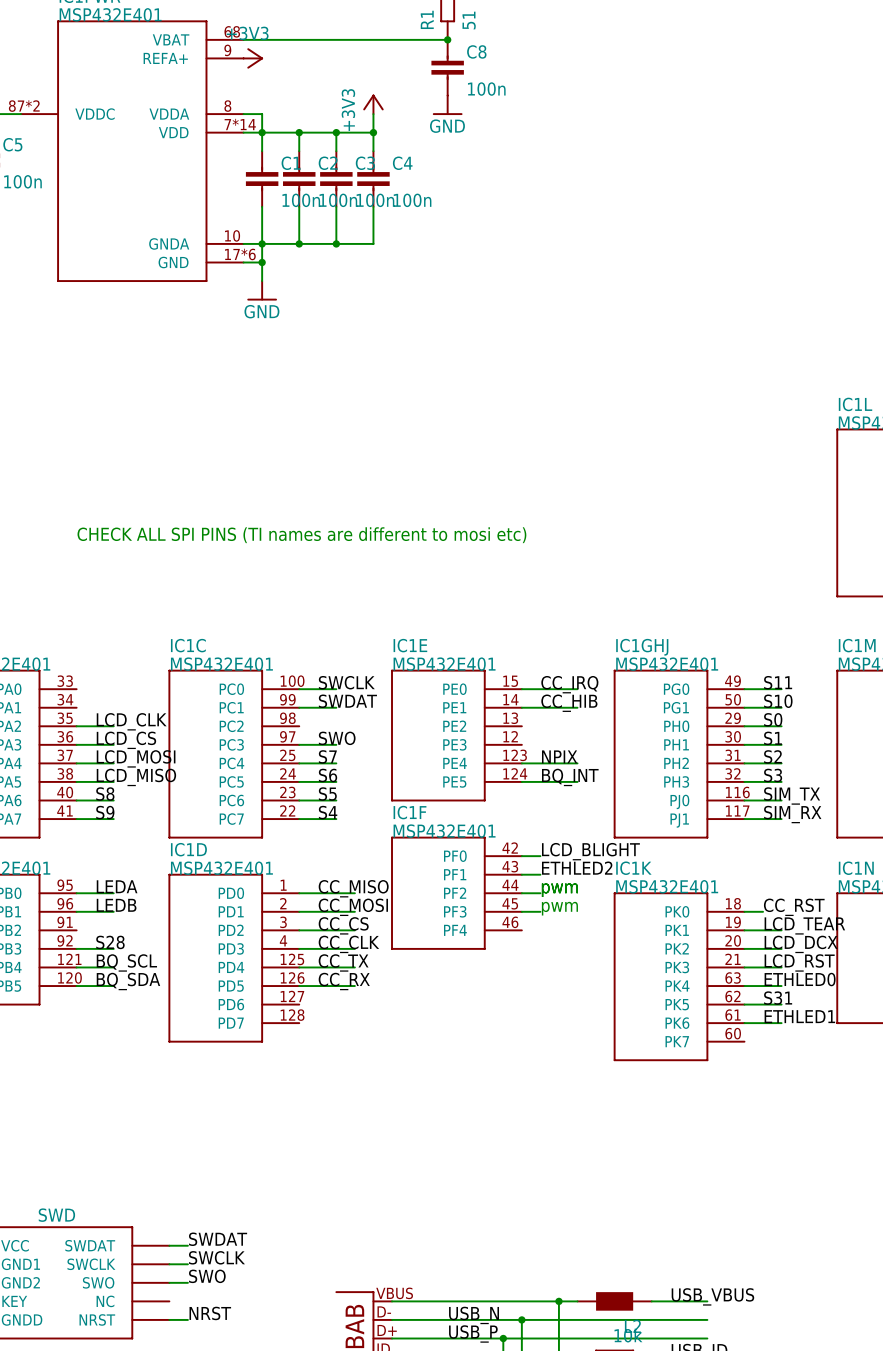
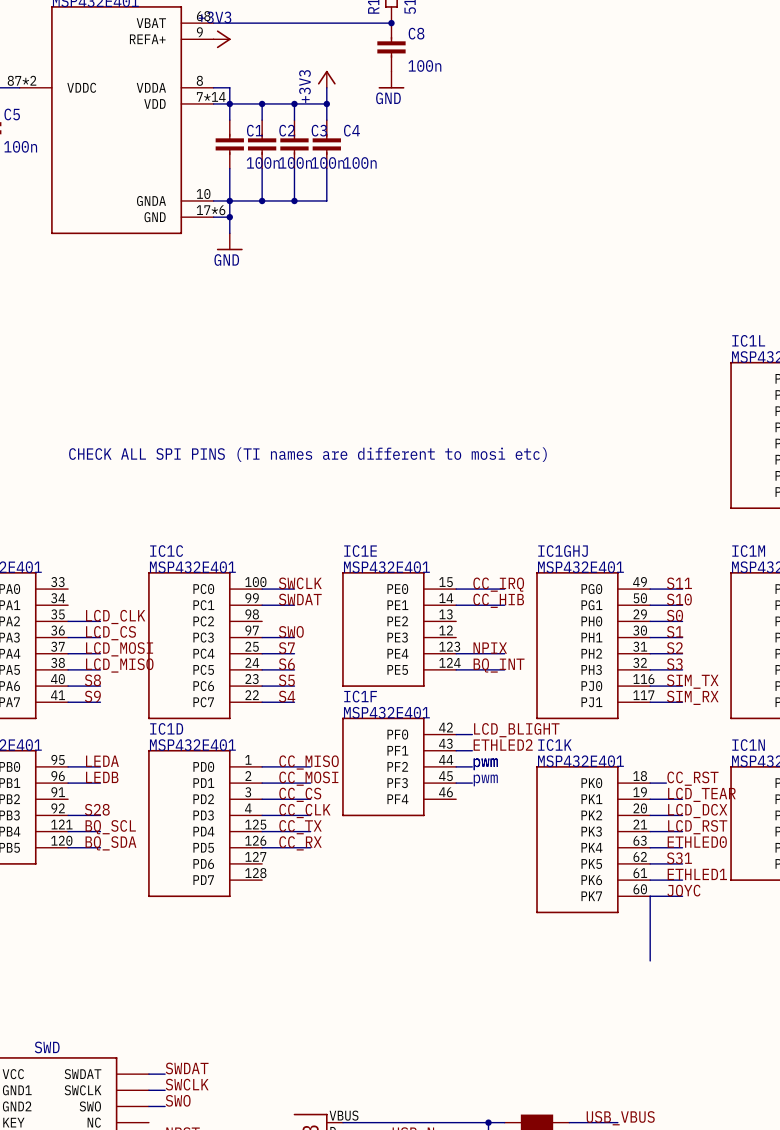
label: none -> JOYC (683, 890)
wire: none -> (682, 896) (650, 896) (650, 960)

